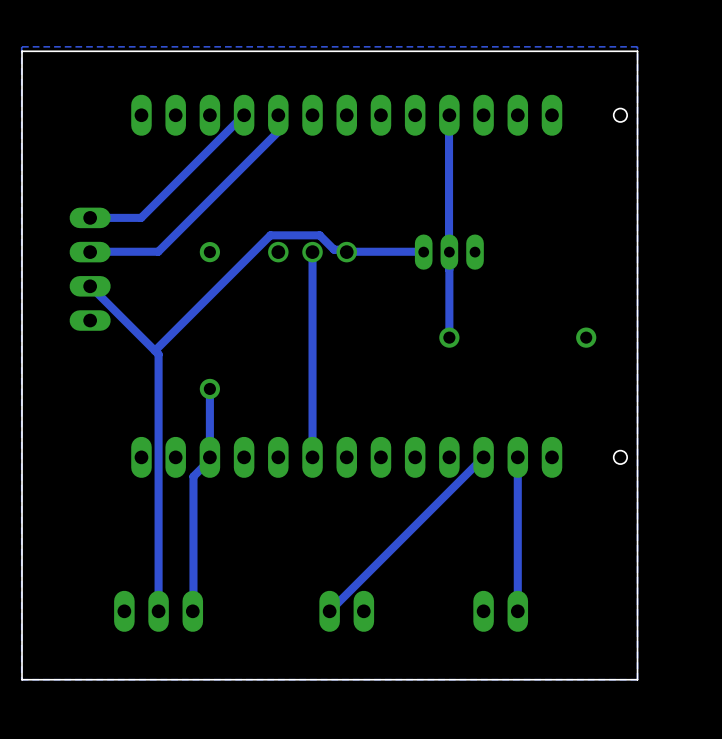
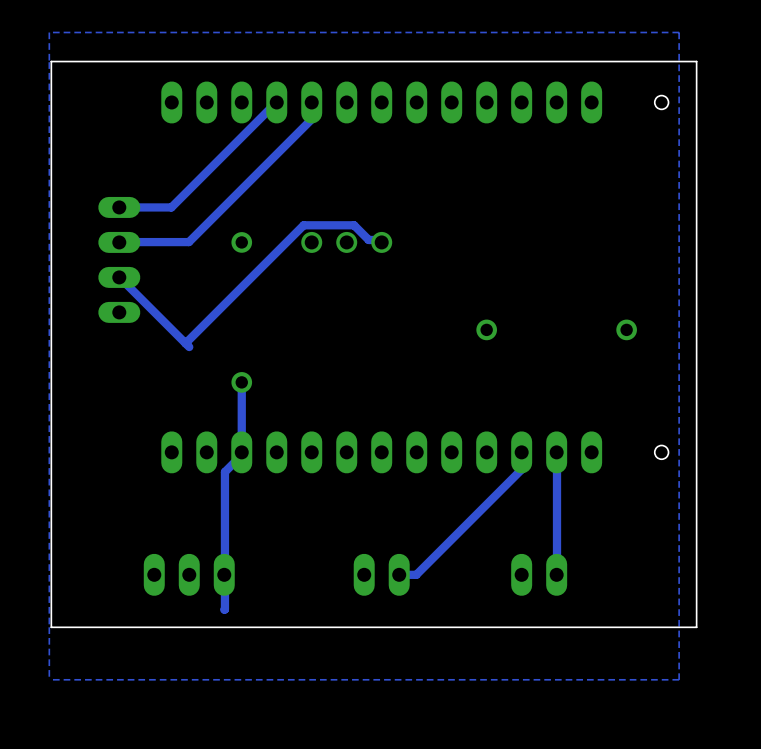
board edge: (637, 51) (22, 51) (22, 679) (637, 679) (637, 51) -> (696, 61) (696, 627) (51, 627) (51, 61) (696, 61)
track: (449, 115) (449, 337) -> none
track: (343, 249) (346, 252) (423, 252) -> none
track: (312, 252) (312, 457) -> none
part: (449, 252) -> none
track: (158, 354) (158, 611) -> none
track: (483, 457) (329, 611) -> (521, 452) (521, 469) (416, 574) (399, 574)
track: (517, 457) (517, 611) -> (556, 452) (556, 574)
part position: (158, 611) -> (189, 574)
part position: (346, 611) -> (381, 574)
part position: (500, 611) -> (539, 574)

